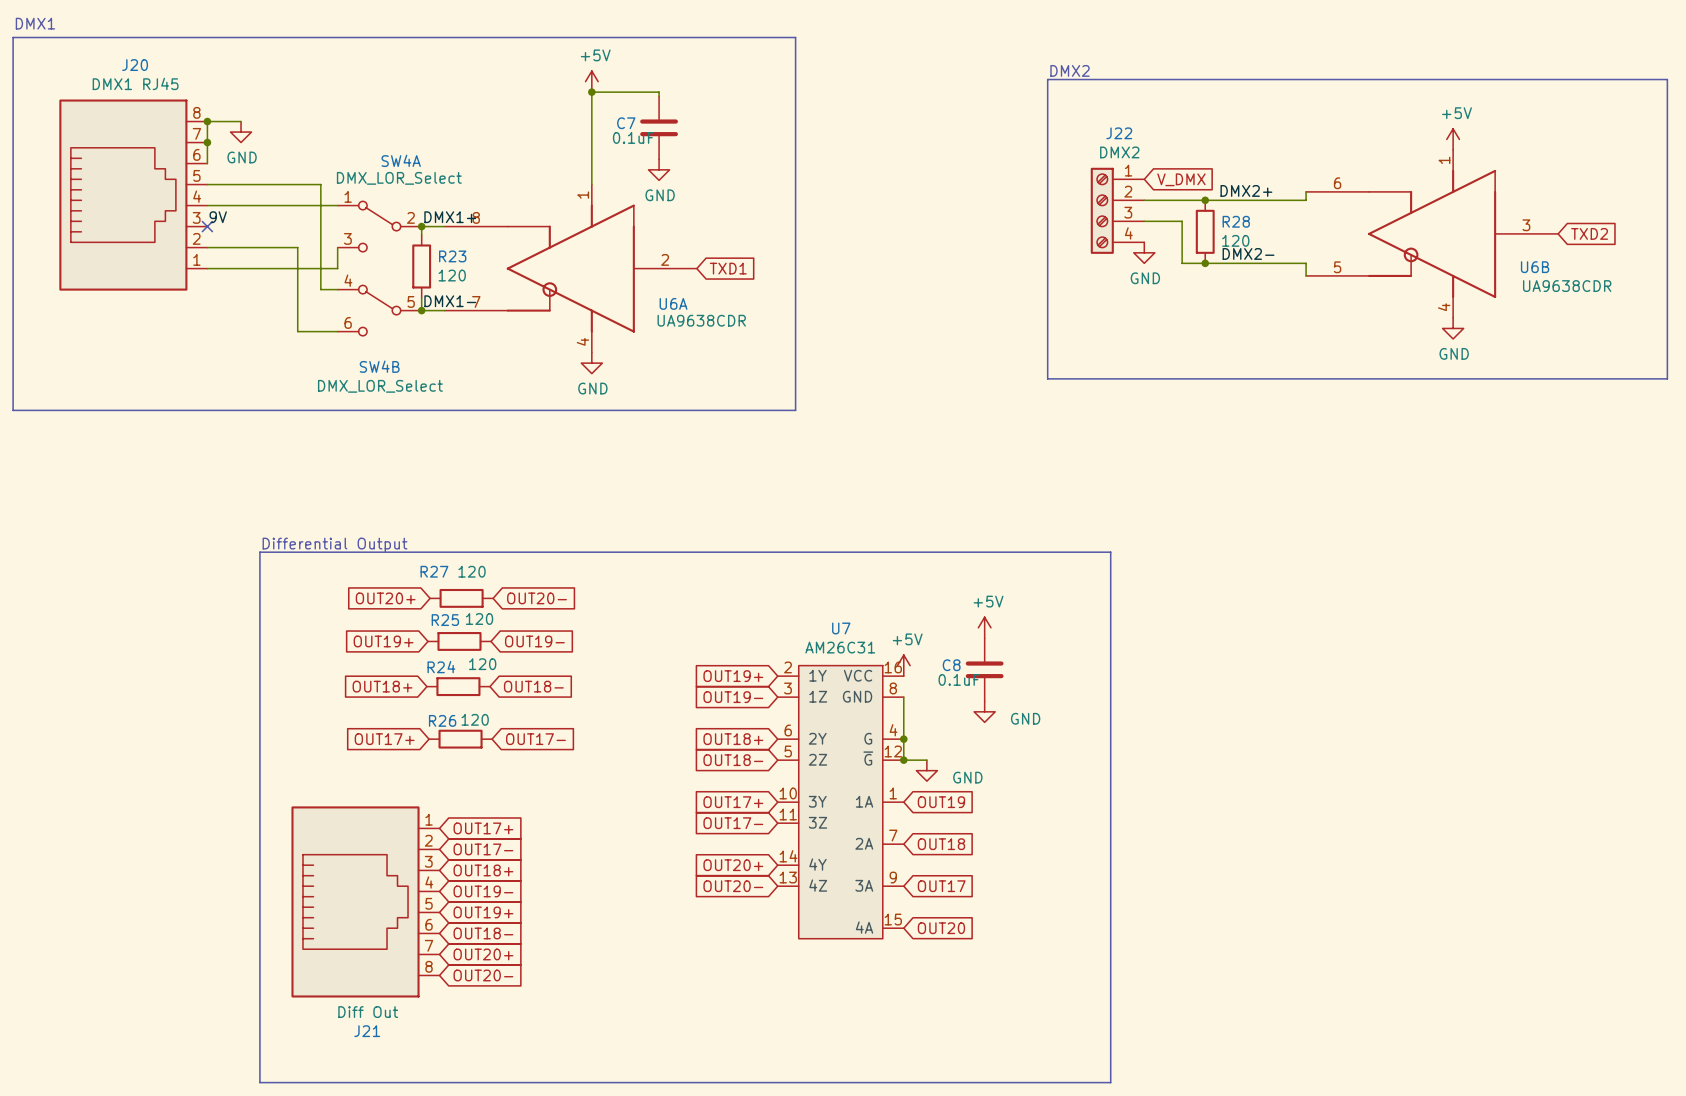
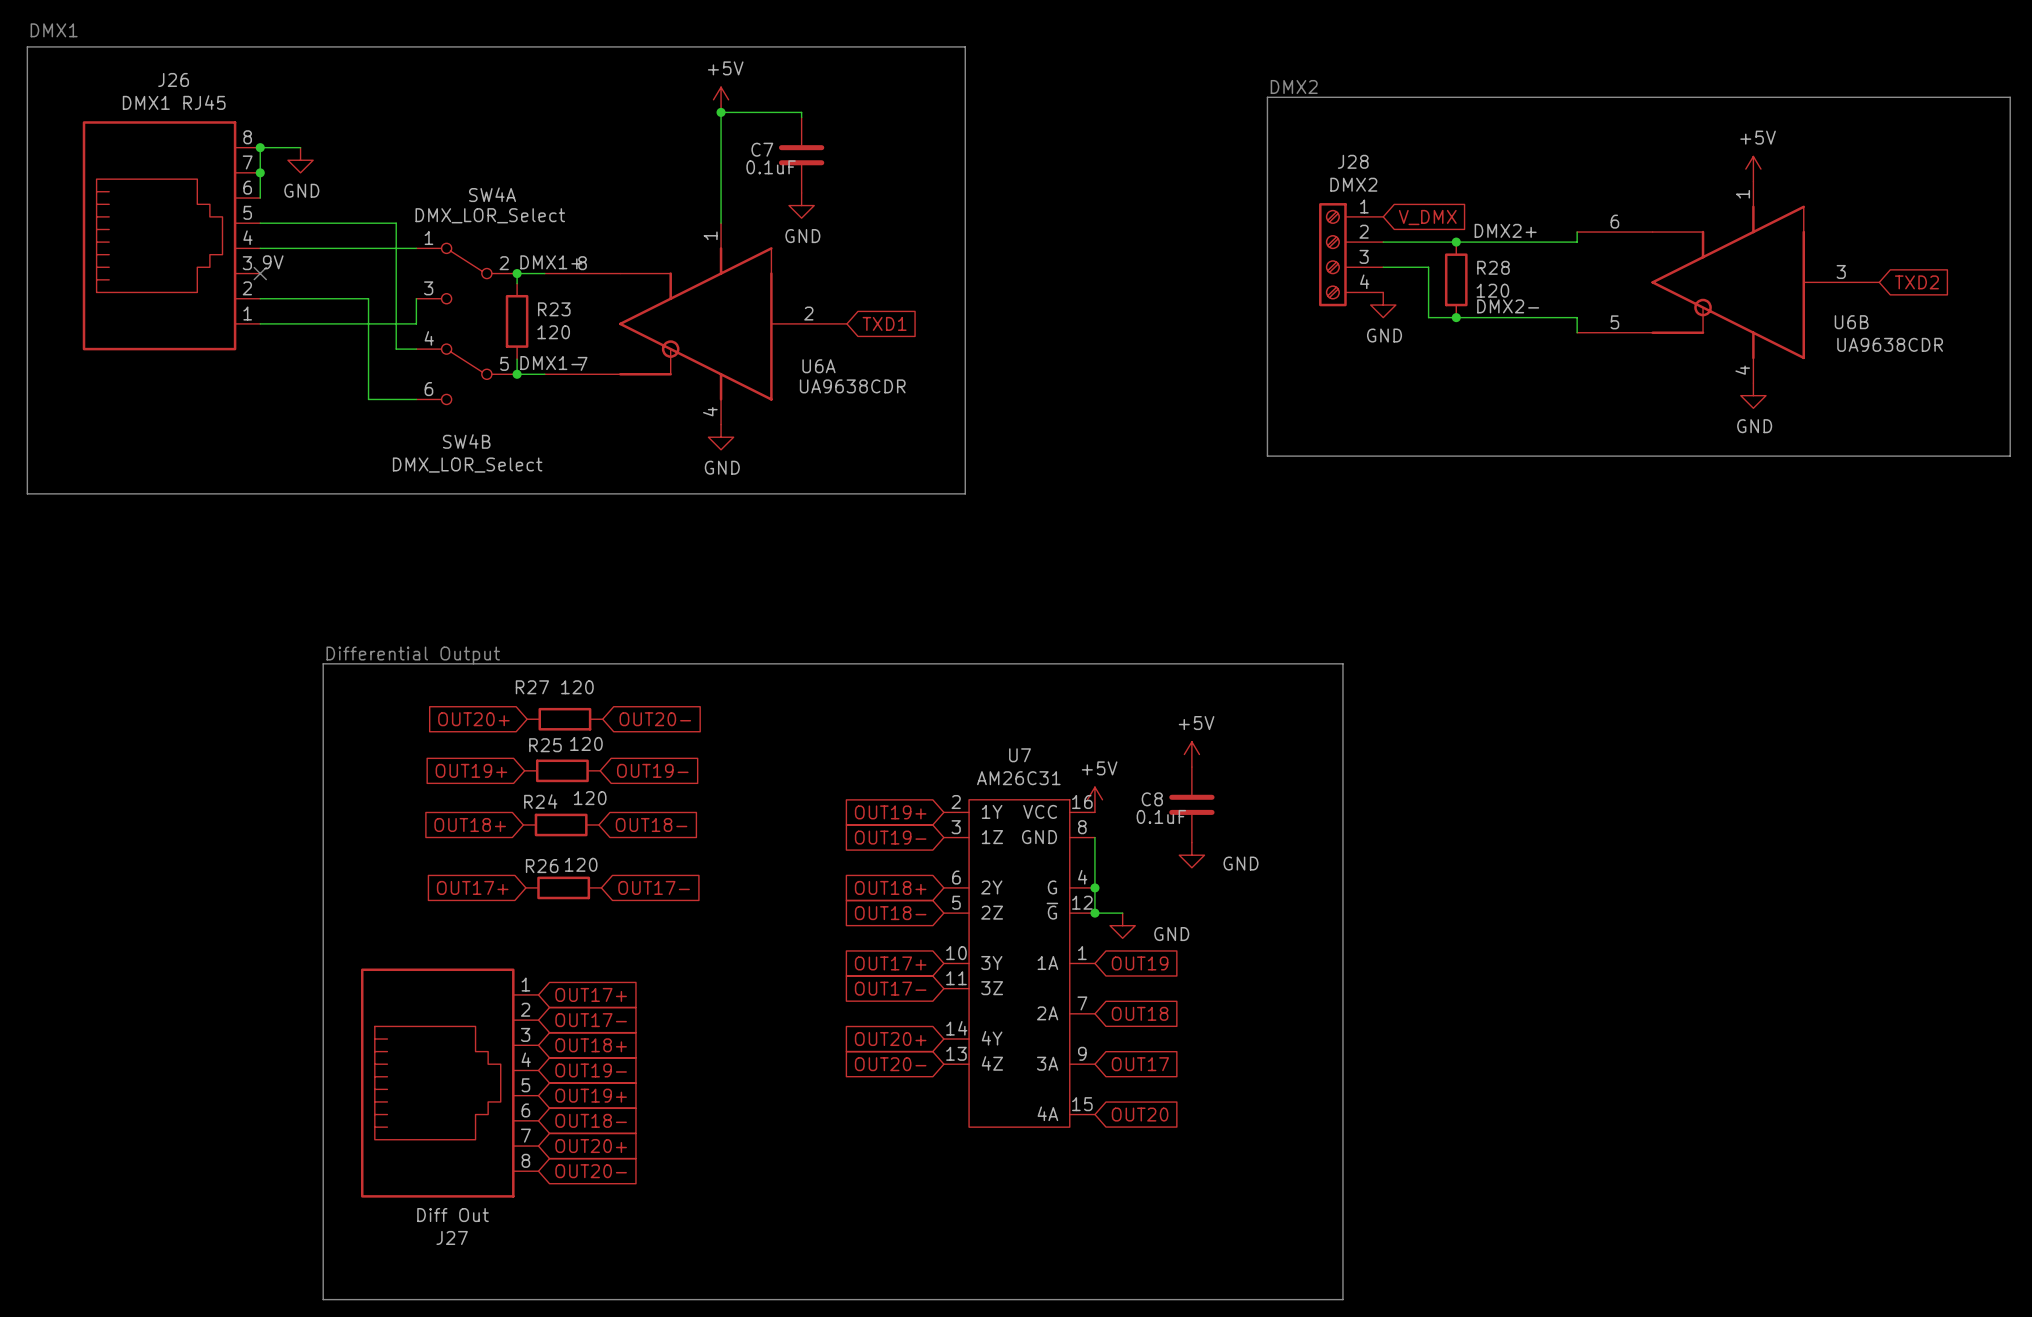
J20 name: J20 (135, 65) -> J26 (173, 79)
J22 name: J22 (1119, 133) -> J28 (1353, 161)
J21 name: J21 (367, 1031) -> J27 (452, 1237)

